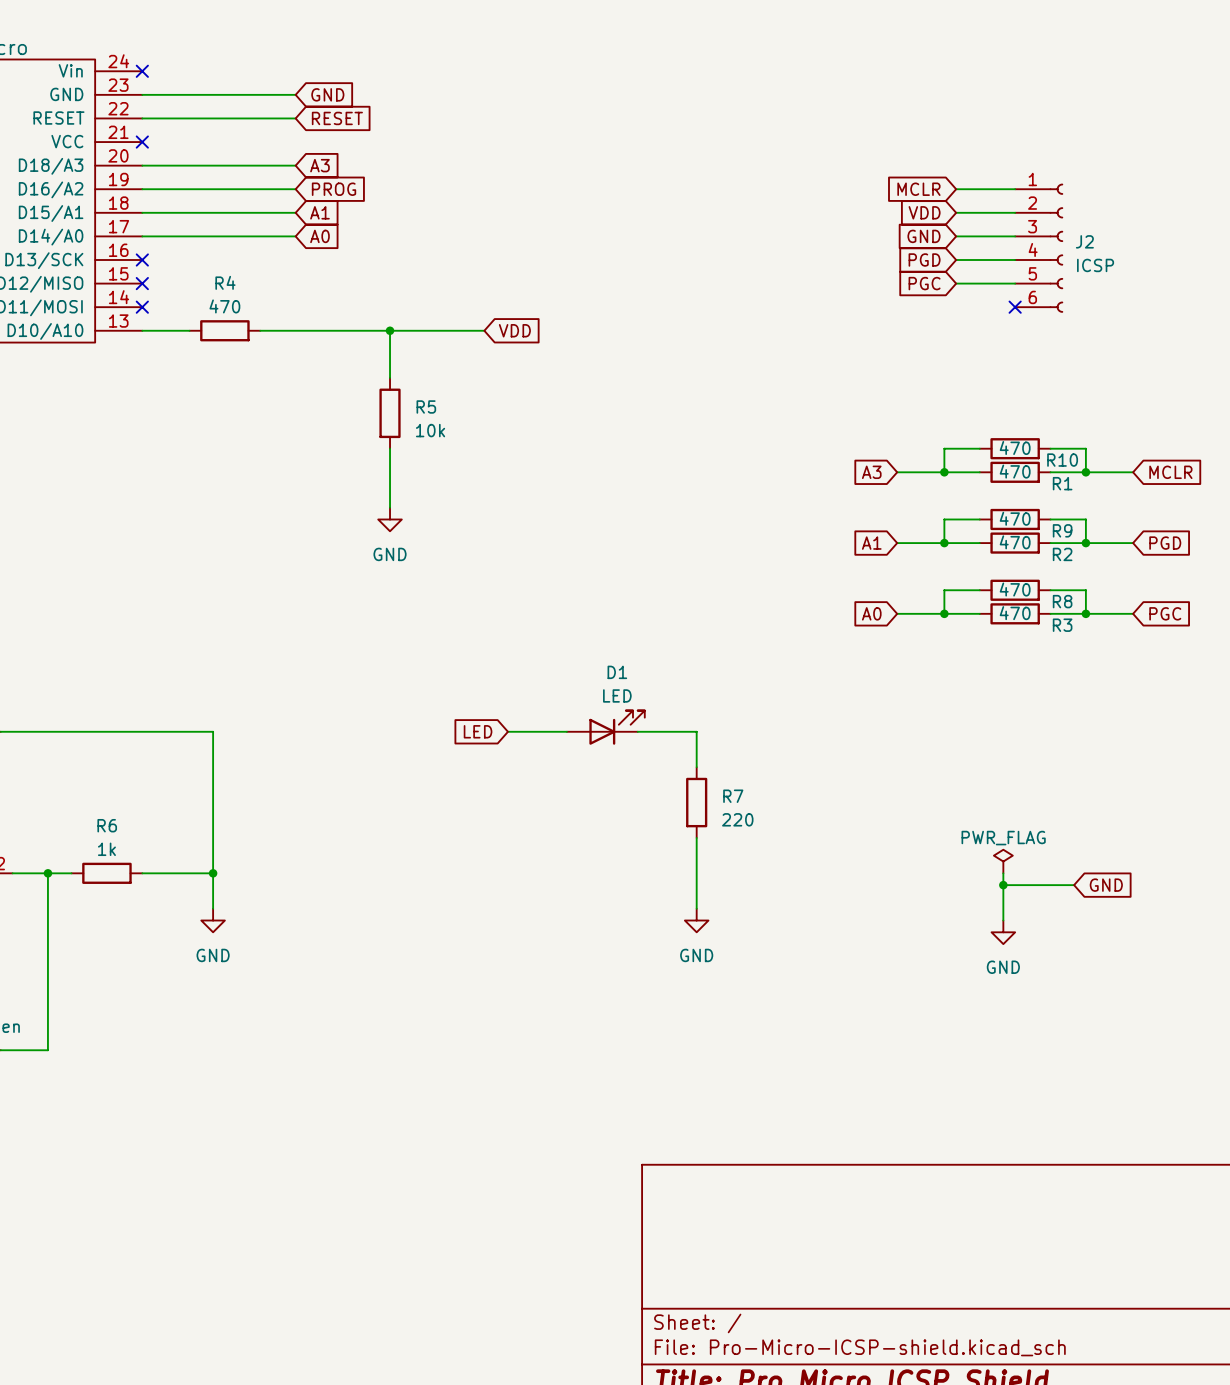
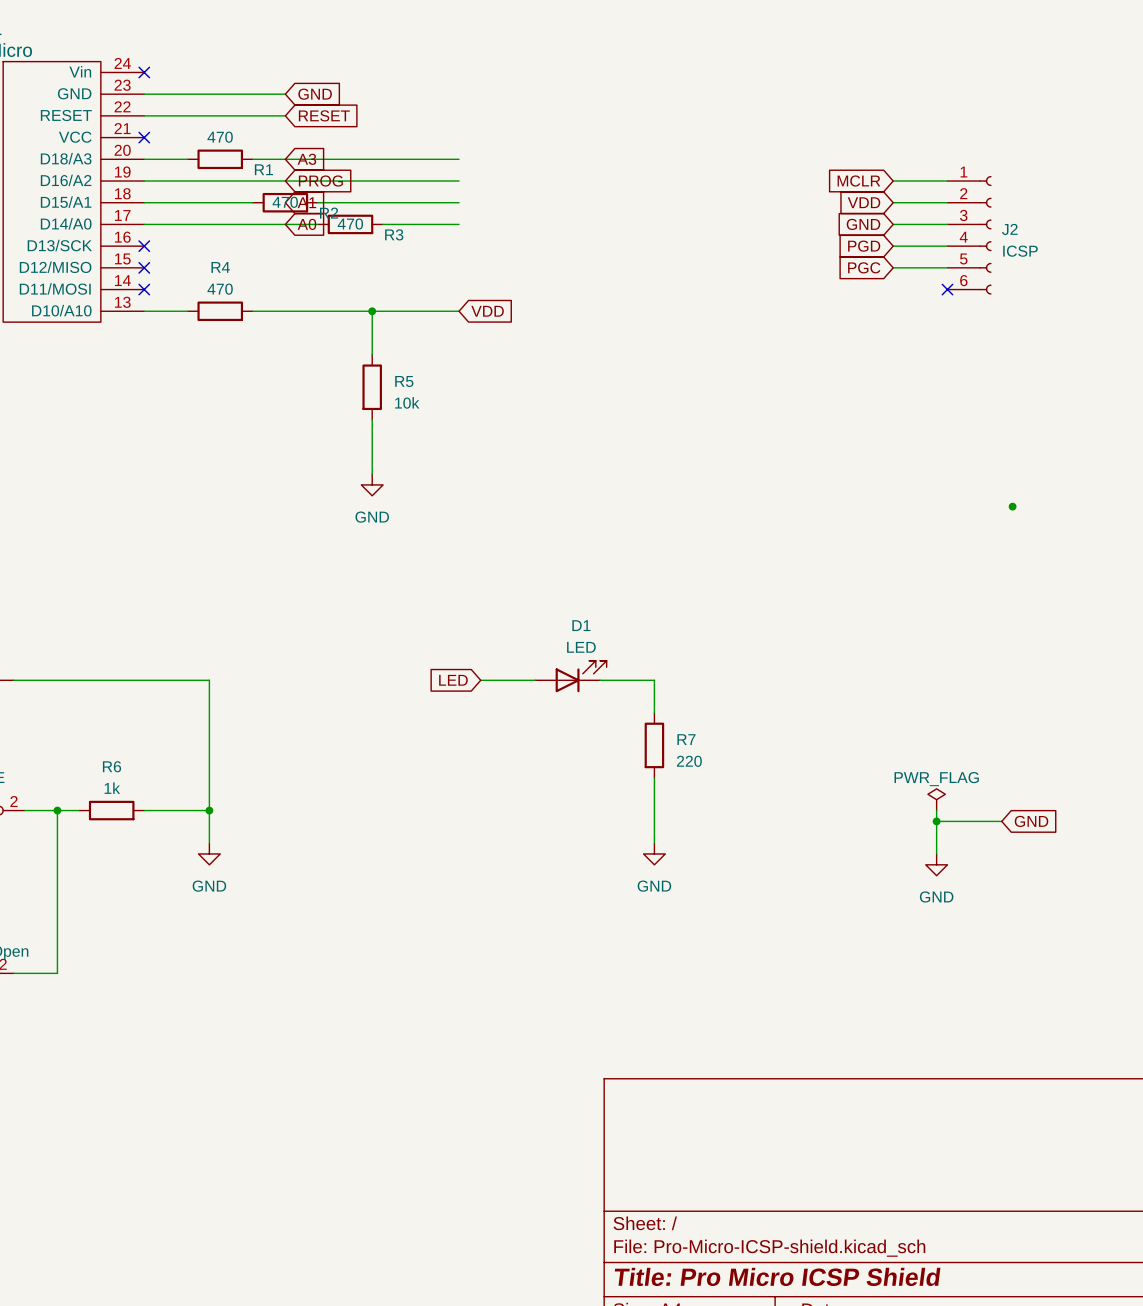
wire: (189, 165) (260, 165) -> none
wire: none -> (285, 159) (459, 159)
wire: none -> (285, 181) (459, 181)
wire: (260, 212) (295, 212) -> (285, 224) (317, 224)
wire: none -> (317, 202) (459, 202)
wire: none -> (383, 224) (459, 224)
wire: (979, 448) (944, 448) (944, 472) -> none
R10: 470 (1015, 448) -> none
wire: (1050, 448) (1085, 448) (1085, 472) -> none
R1 value position: 470 (1015, 471) -> 470 (220, 137)
global label: A3 (871, 472) -> none
wire: (897, 472) (979, 472) -> none
junction: (944, 472) -> none
R1 position: (1015, 472) -> (220, 159)
wire: (1050, 472) (1133, 472) -> none
junction: (1085, 472) -> none
global label: MCLR (1170, 472) -> none
wire: (979, 519) (944, 519) (944, 543) -> none
R9: 470 (1015, 519) -> none
wire: (1050, 519) (1085, 519) (1085, 543) -> none
global label: A1 (871, 543) -> none
wire: (897, 543) (979, 543) -> none
junction: (944, 543) -> none
R2 position: (1015, 543) -> (285, 202)
wire: (1050, 543) (1133, 543) -> none
global label: PGD (1165, 543) -> none
wire: (979, 590) (944, 590) (944, 613) -> none
R8: 470 (1015, 590) -> none
wire: (1050, 590) (1085, 590) (1085, 613) -> none
global label: A0 (871, 613) -> none
wire: (897, 613) (979, 613) -> none
junction: (944, 613) -> none
R3 position: (1015, 613) -> (350, 224)
wire: (1050, 613) (1133, 613) -> none
junction: (1085, 613) -> none
global label: PGC (1165, 613) -> none

